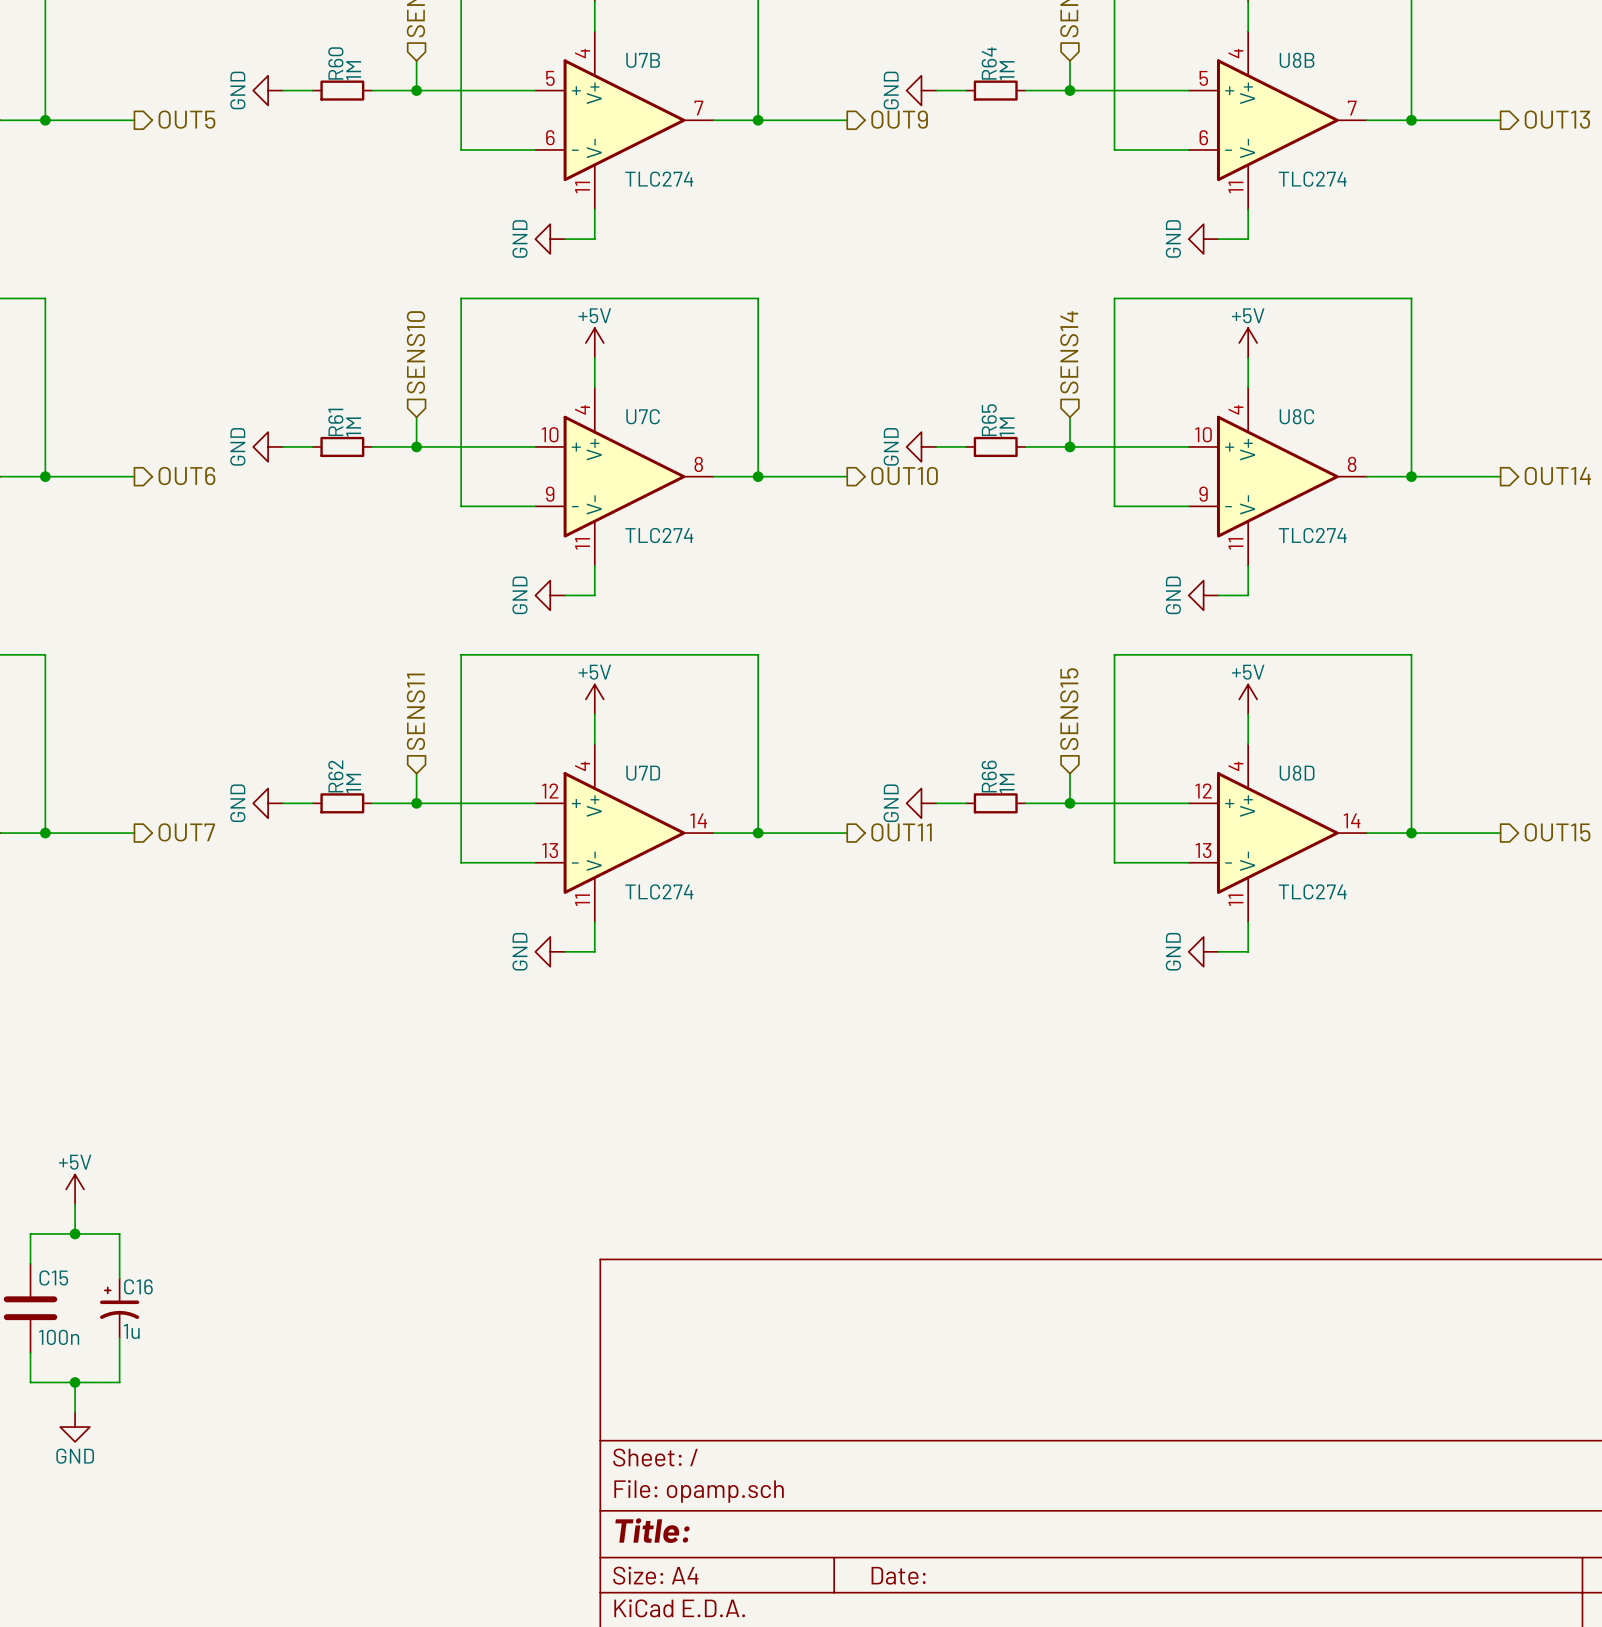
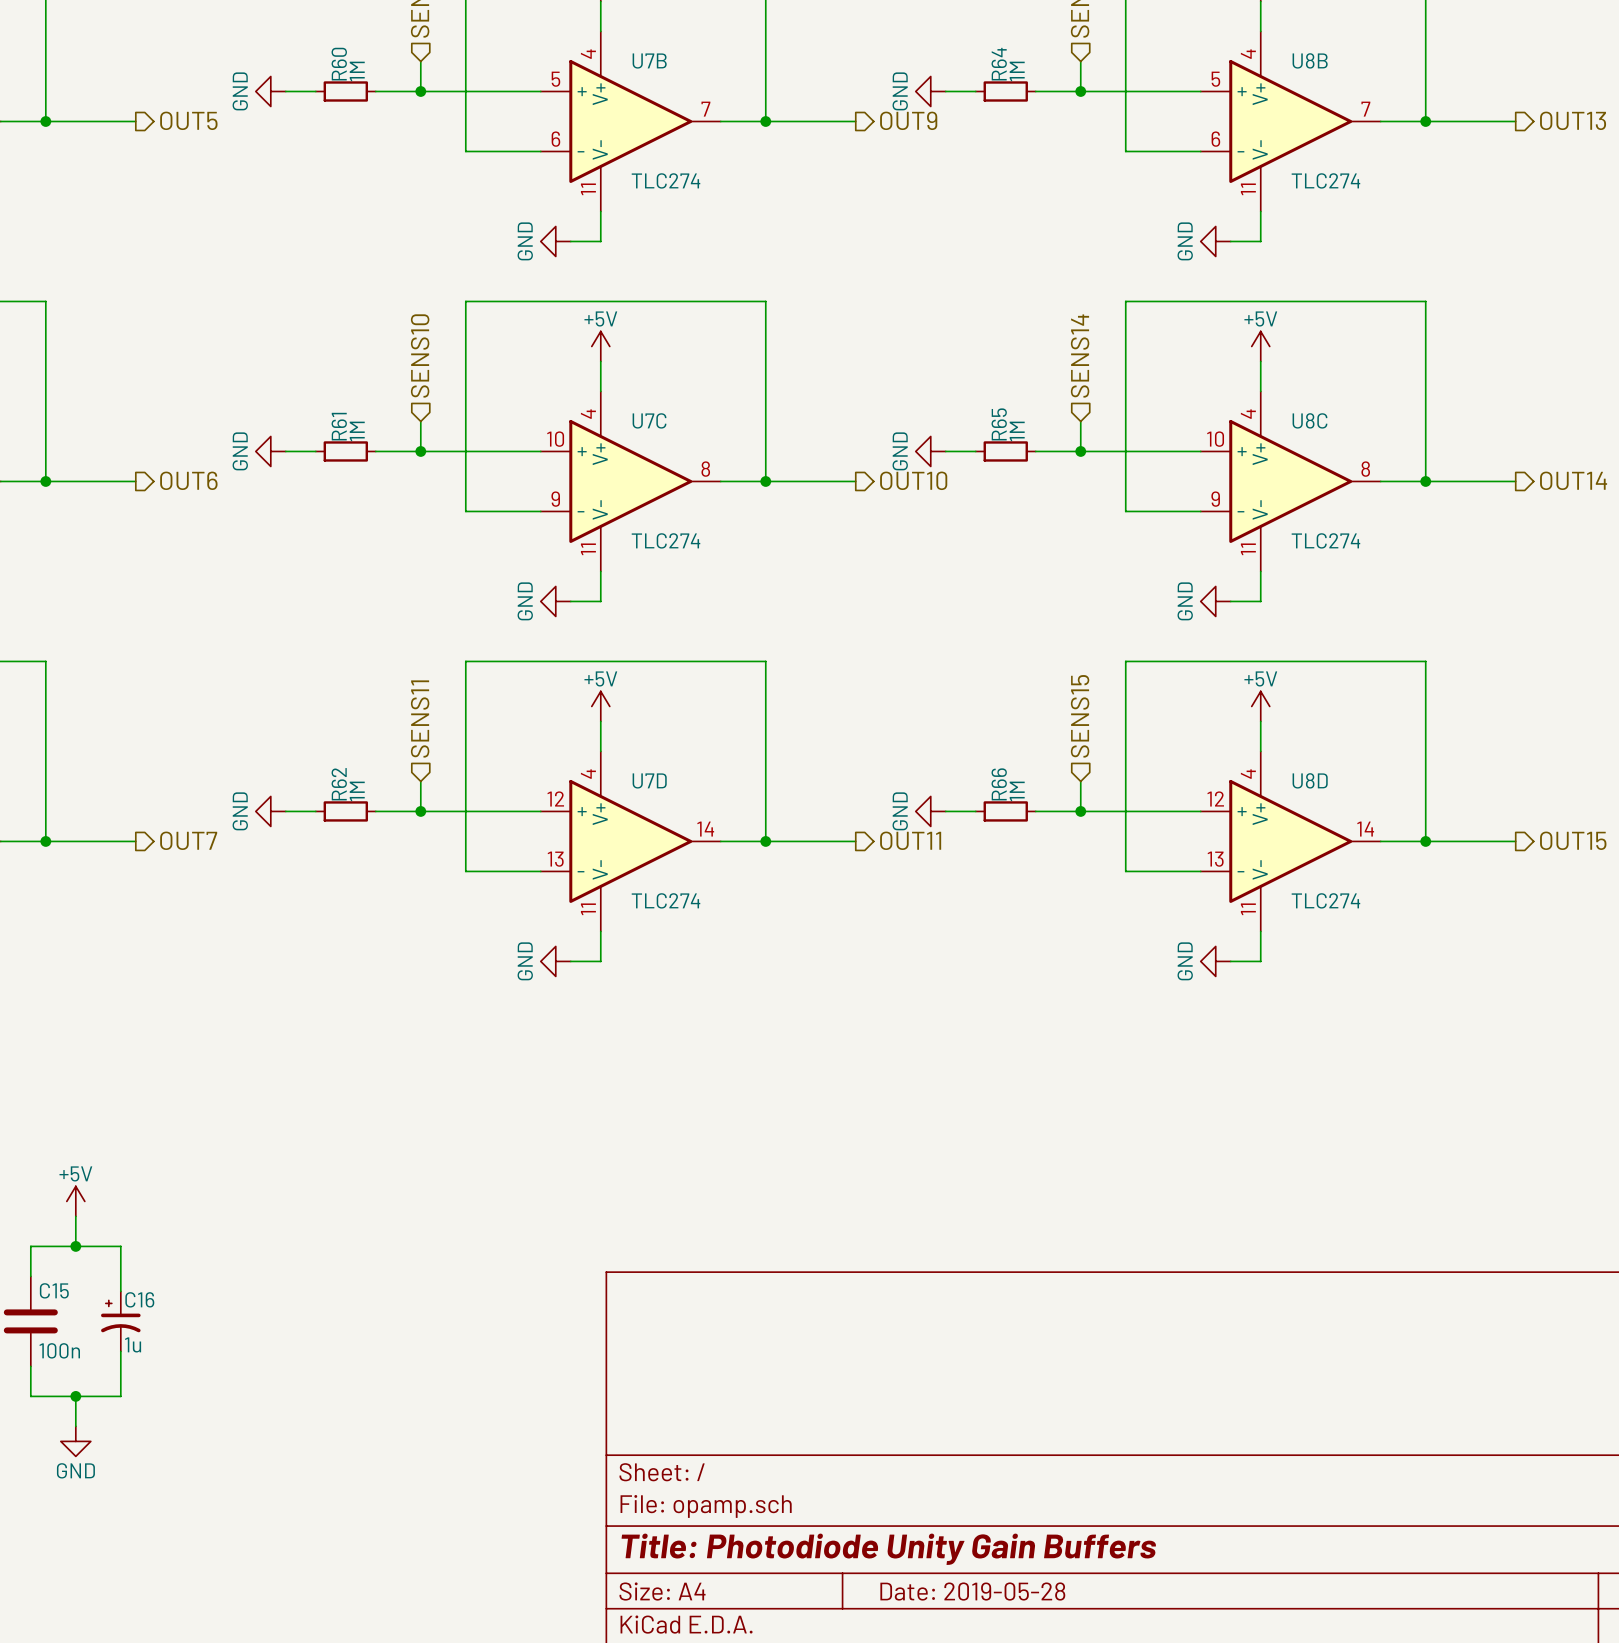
title block: Title: (652, 1530) -> Title: Photodiode Unity Gain Buffers (888, 1549)
title block: Date: (898, 1575) -> Date: 2019-05-28 (972, 1591)

